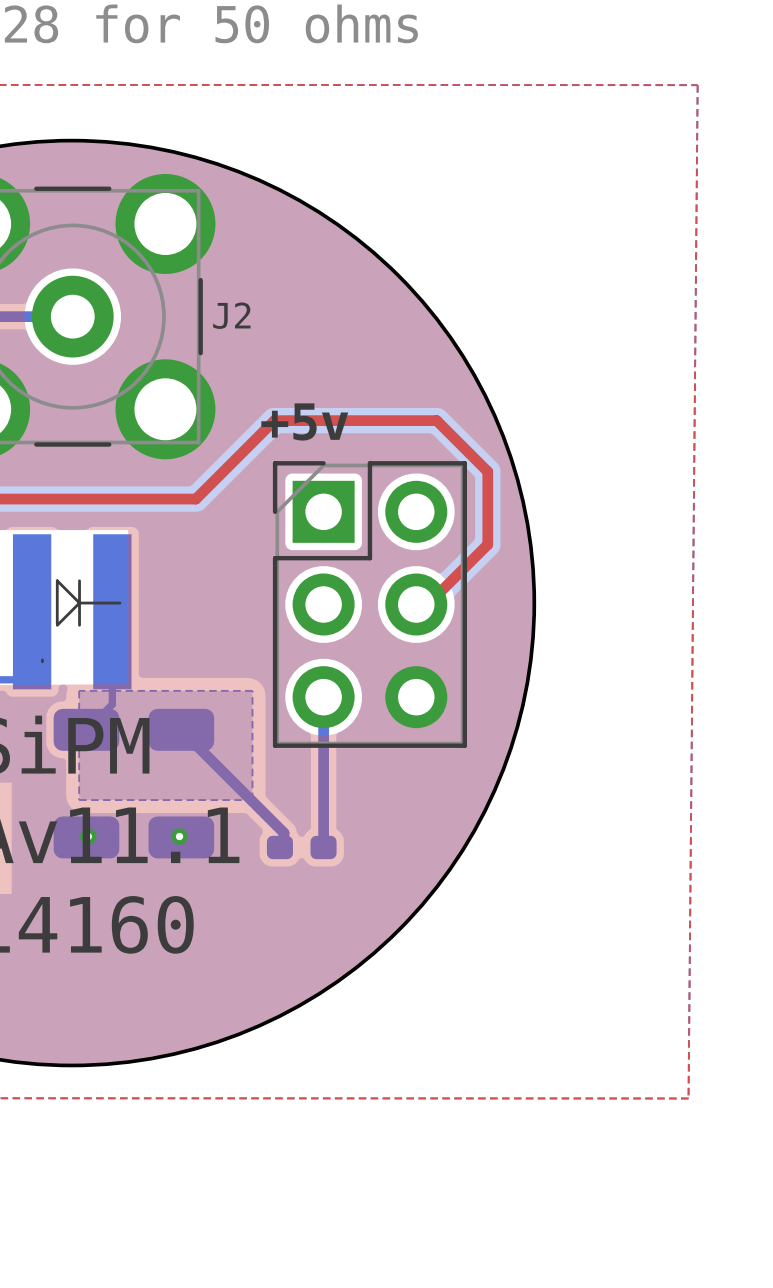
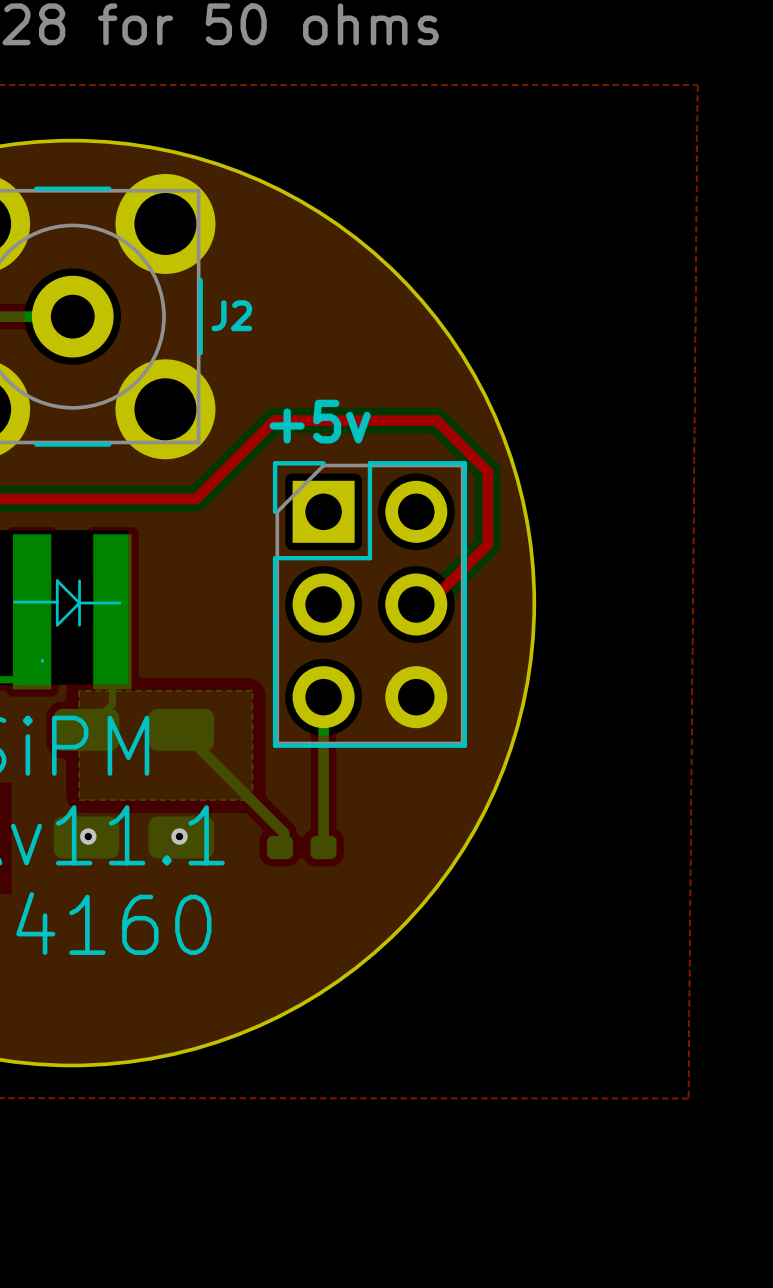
line: none -> (14, 602) (57, 602)

